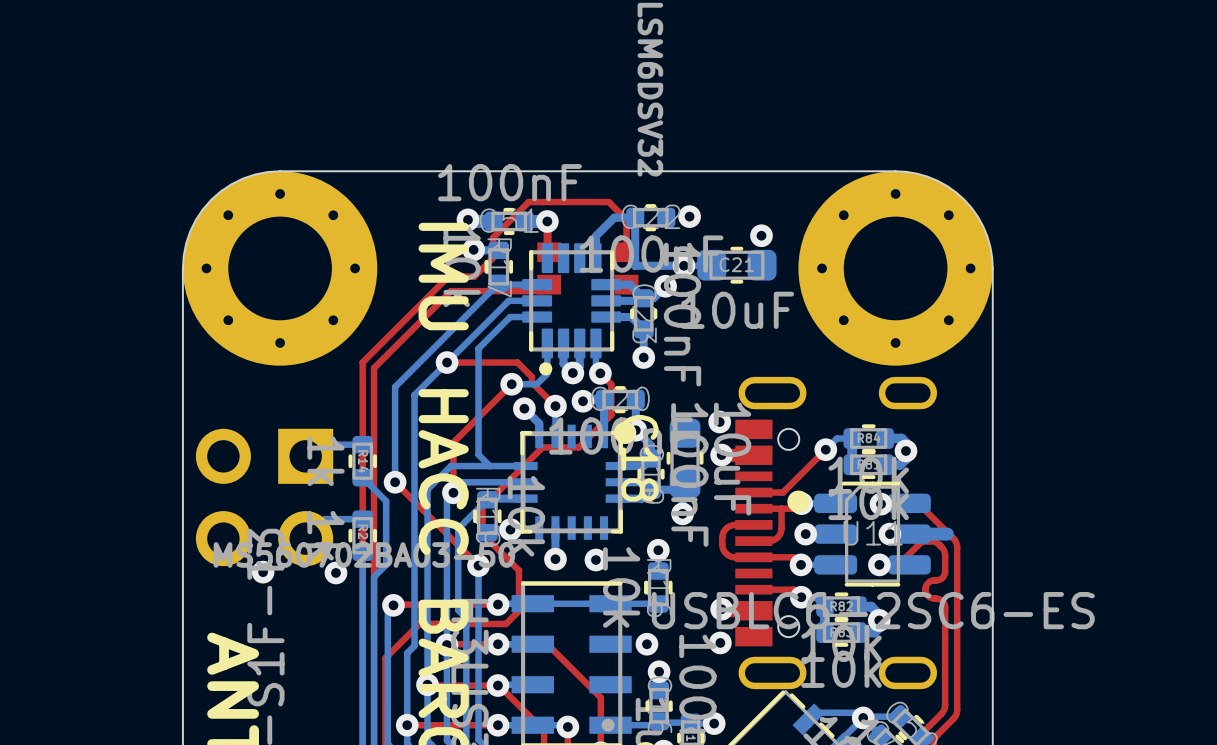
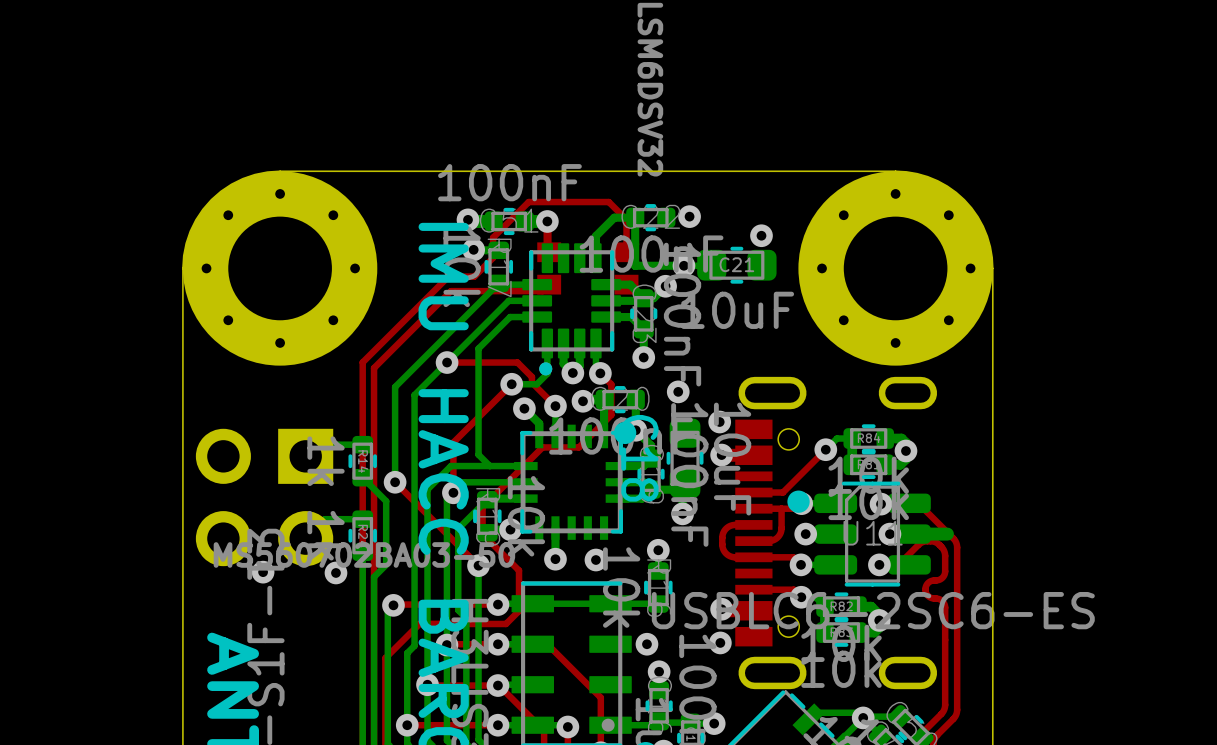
via: none -> (678, 391)

